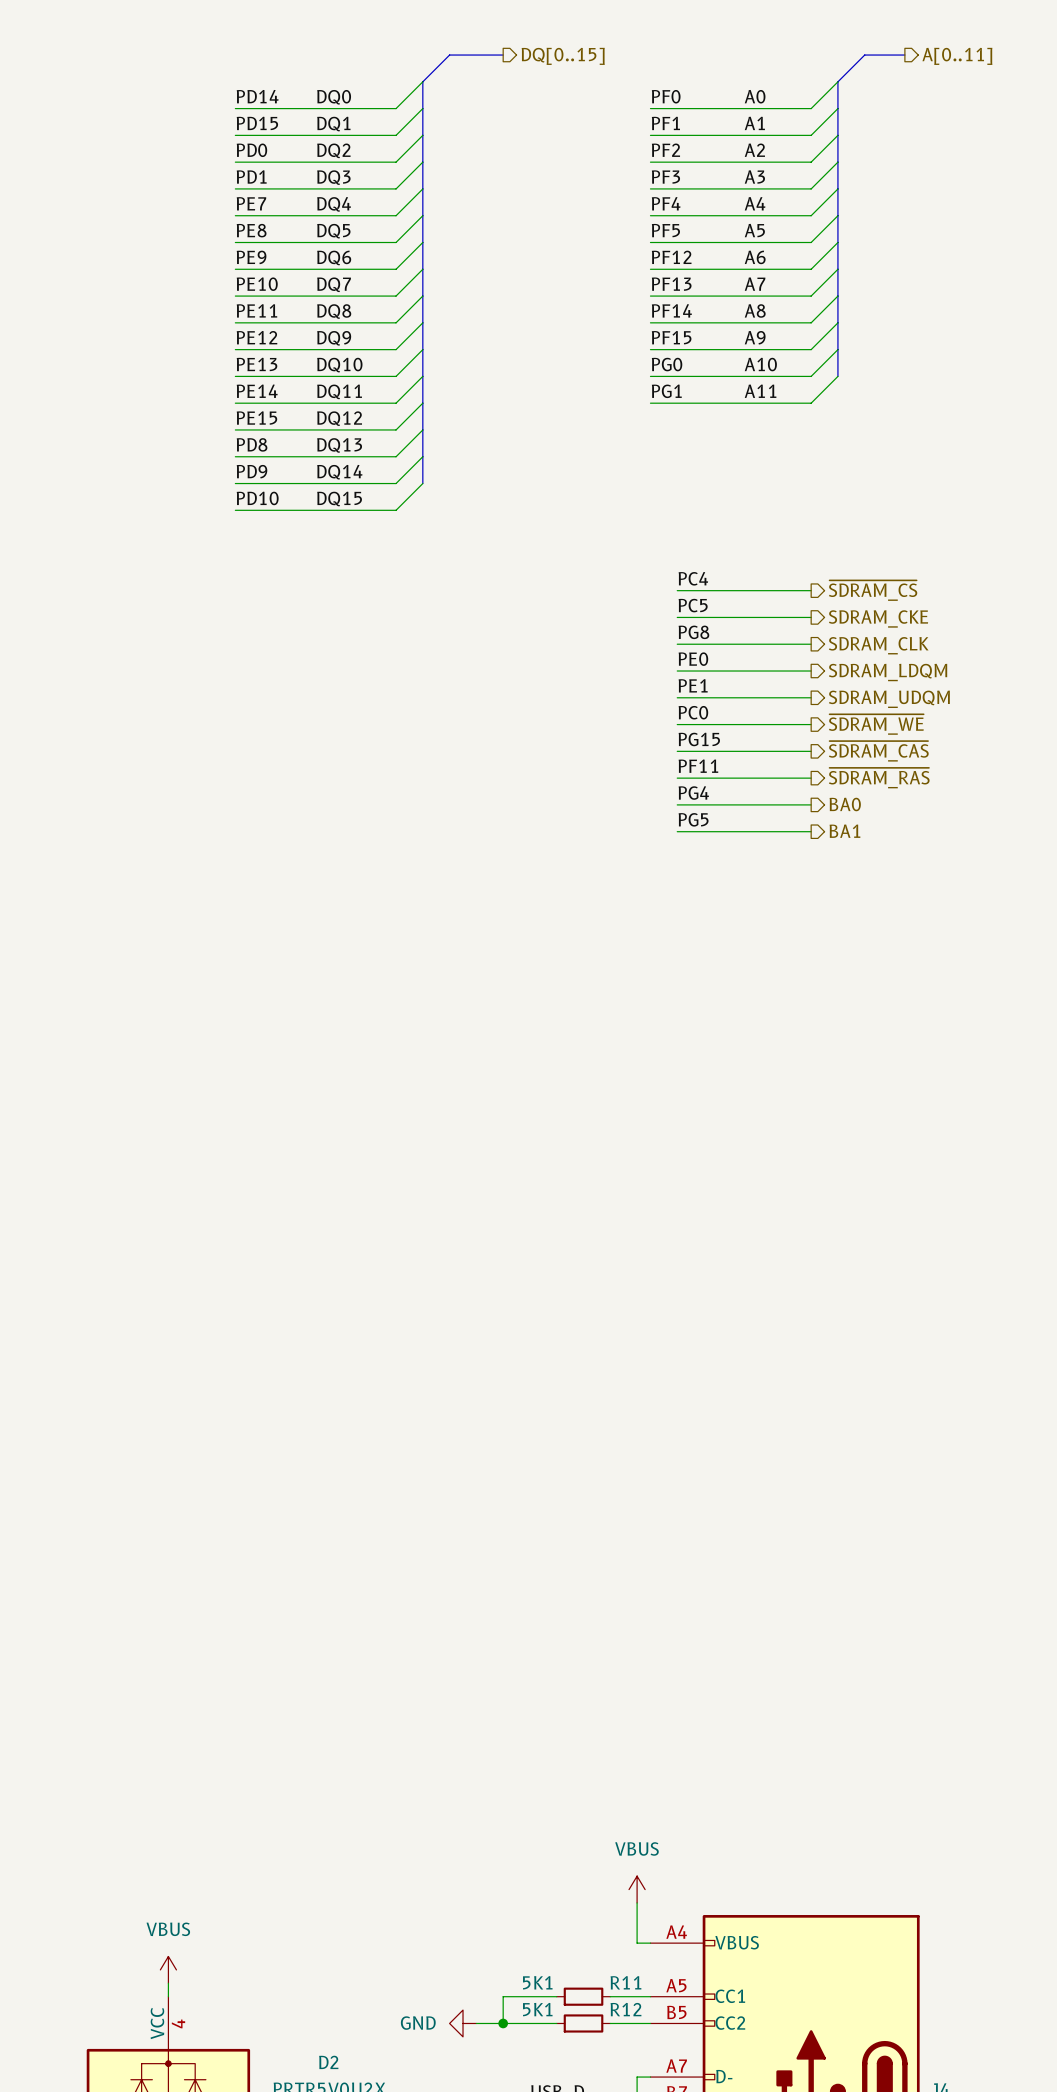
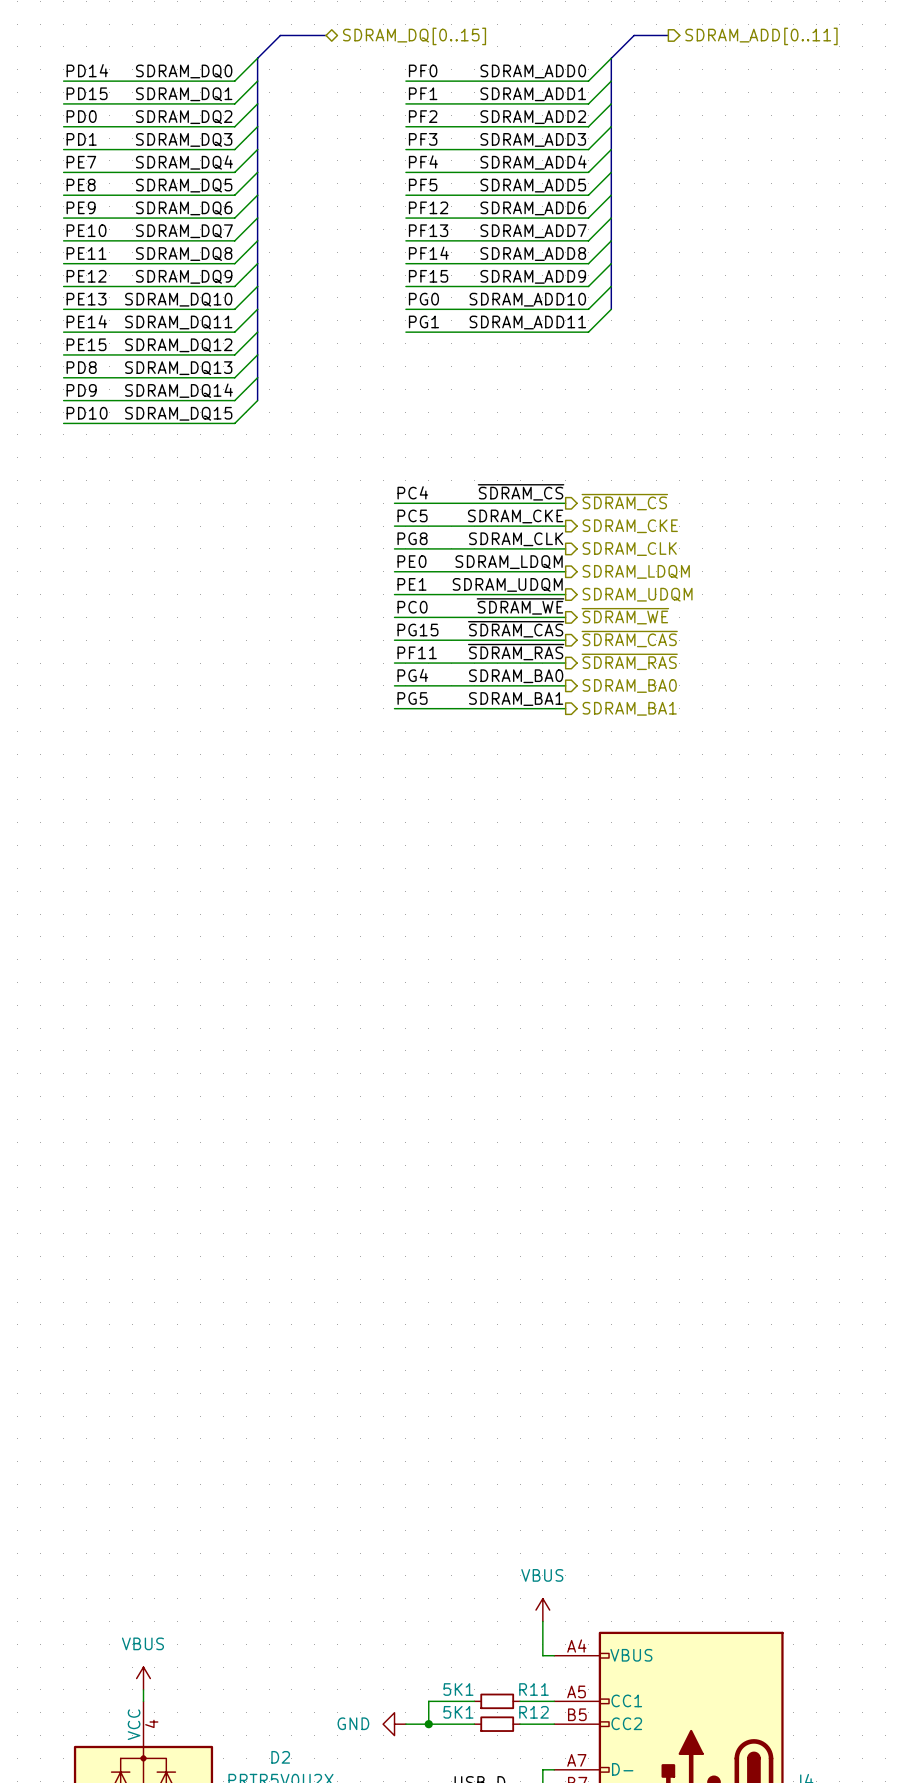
bus: (503, 55) (449, 55) (422, 81) (422, 483) -> (326, 35) (280, 35) (257, 58) (257, 400)
bus: (904, 55) (864, 55) (837, 81) (837, 376) -> (668, 35) (634, 35) (611, 58) (611, 309)
hierarchical label shape: output (563, 56) -> bidirectional (414, 36)
hierarchical label: DQ[0..15] (563, 56) -> SDRAM_DQ[0..15] (414, 36)
hierarchical label: A[0..11] (957, 56) -> SDRAM_ADD[0..11] (761, 36)
wire: none -> (257, 58) (234, 81) (63, 81)
wire: none -> (611, 58) (588, 81) (405, 81)
wire: (422, 81) (396, 108) (235, 108) -> none
wire: (837, 81) (811, 108) (650, 108) -> none
label: none -> SDRAM_DQ0 (184, 71)
label: none -> SDRAM_ADD0 (533, 71)
wire: none -> (257, 81) (234, 103) (63, 103)
wire: none -> (611, 81) (588, 103) (405, 103)
label position: PD14 (257, 96) -> PD14 (87, 70)
label position: PF0 (666, 96) -> PF0 (423, 70)
label: A0 (755, 96) -> none
label: DQ0 (334, 97) -> none
wire: (422, 108) (396, 135) (235, 135) -> none
wire: (837, 108) (811, 135) (650, 135) -> none
label: none -> SDRAM_DQ1 (184, 94)
label: none -> SDRAM_ADD1 (533, 94)
wire: none -> (257, 103) (234, 126) (63, 126)
wire: none -> (611, 103) (588, 126) (405, 126)
label position: PD15 (257, 123) -> PD15 (87, 93)
label position: PF1 (665, 123) -> PF1 (423, 93)
label: A1 (754, 123) -> none
label: DQ1 (333, 124) -> none
wire: (422, 135) (396, 162) (235, 162) -> none
wire: (837, 135) (811, 162) (650, 162) -> none
label: none -> SDRAM_DQ2 (184, 117)
label: none -> SDRAM_ADD2 (533, 117)
wire: none -> (257, 126) (234, 149) (63, 149)
wire: none -> (611, 126) (588, 149) (405, 149)
label position: PD0 (251, 150) -> PD0 (81, 116)
label: DQ2 (333, 150) -> none
label position: PF2 (665, 150) -> PF2 (423, 116)
label: A2 (754, 150) -> none
wire: (422, 162) (396, 188) (235, 188) -> none
wire: (837, 162) (811, 188) (650, 188) -> none
label: none -> SDRAM_DQ3 (184, 139)
label: none -> SDRAM_ADD3 (533, 139)
wire: none -> (257, 149) (234, 172) (63, 172)
wire: none -> (611, 149) (588, 172) (405, 172)
label position: PD1 (251, 176) -> PD1 (81, 139)
label: A3 (754, 176) -> none
label: DQ3 (333, 177) -> none
label position: PF3 (665, 177) -> PF3 (423, 139)
wire: (422, 188) (396, 215) (235, 215) -> none
wire: (837, 188) (811, 215) (650, 215) -> none
label: none -> SDRAM_DQ4 (184, 162)
label: none -> SDRAM_ADD4 (533, 162)
wire: none -> (257, 172) (234, 195) (63, 195)
wire: none -> (611, 172) (588, 195) (405, 195)
label position: PE7 (251, 203) -> PE7 (81, 162)
label position: PF4 (666, 203) -> PF4 (423, 161)
label: A4 (755, 203) -> none
label: DQ4 (334, 204) -> none
wire: (422, 215) (396, 242) (235, 242) -> none
wire: (837, 215) (811, 242) (650, 242) -> none
label: none -> SDRAM_DQ5 (184, 185)
label: none -> SDRAM_ADD5 (533, 185)
wire: none -> (257, 195) (234, 218) (63, 218)
wire: none -> (611, 195) (588, 218) (405, 218)
label position: PE8 (251, 230) -> PE8 (81, 185)
label position: PF5 (665, 230) -> PF5 (423, 185)
label: A5 (754, 230) -> none
label: DQ5 (333, 231) -> none
wire: (422, 242) (396, 269) (235, 269) -> none
wire: (837, 242) (811, 269) (650, 269) -> none
label: none -> SDRAM_DQ6 (184, 208)
label: none -> SDRAM_ADD6 (533, 208)
wire: none -> (257, 218) (234, 240) (63, 240)
wire: none -> (611, 218) (588, 240) (405, 240)
label position: PE9 (251, 257) -> PE9 (81, 207)
label: DQ6 (334, 257) -> none
label position: PF12 (671, 257) -> PF12 (428, 207)
label: A6 (755, 257) -> none
wire: (422, 269) (396, 296) (235, 296) -> none
wire: (837, 269) (811, 296) (650, 296) -> none
label: none -> SDRAM_DQ7 (184, 231)
label: none -> SDRAM_ADD7 (533, 231)
wire: none -> (257, 240) (234, 263) (63, 263)
wire: none -> (611, 240) (588, 263) (405, 263)
label position: PE10 (257, 284) -> PE10 (86, 230)
label: DQ7 (334, 284) -> none
label position: PF13 (671, 284) -> PF13 (428, 230)
label: A7 (755, 284) -> none
wire: (422, 296) (396, 322) (235, 322) -> none
wire: (837, 296) (811, 322) (650, 322) -> none
label: none -> SDRAM_DQ8 (184, 254)
label: none -> SDRAM_ADD8 (533, 254)
wire: none -> (257, 263) (234, 286) (63, 286)
wire: none -> (611, 263) (588, 286) (405, 286)
label position: PE11 (256, 310) -> PE11 (86, 253)
label position: PF14 (671, 310) -> PF14 (428, 253)
label: A8 (755, 310) -> none
label: DQ8 (334, 311) -> none
wire: (422, 322) (396, 349) (235, 349) -> none
wire: (837, 322) (811, 349) (650, 349) -> none
label: none -> SDRAM_DQ9 (184, 276)
label: none -> SDRAM_ADD9 (533, 276)
wire: none -> (257, 286) (234, 309) (63, 309)
wire: none -> (611, 286) (588, 309) (405, 309)
label position: PE12 (256, 337) -> PE12 (86, 276)
label position: PF15 (671, 337) -> PF15 (428, 276)
label: A9 (755, 337) -> none
label: DQ9 (334, 338) -> none
wire: (422, 349) (396, 376) (235, 376) -> none
wire: (837, 349) (811, 376) (650, 376) -> none
label: none -> SDRAM_DQ10 (178, 299)
label: none -> SDRAM_ADD10 (527, 299)
wire: none -> (257, 309) (234, 332) (63, 332)
wire: none -> (611, 309) (588, 332) (405, 332)
label position: PE13 (257, 364) -> PE13 (86, 299)
label position: PG0 (667, 364) -> PG0 (423, 299)
label: A10 (760, 364) -> none
label: DQ10 (339, 365) -> none
wire: (422, 376) (396, 403) (235, 403) -> none
wire: (837, 376) (811, 403) (650, 403) -> none
label: none -> SDRAM_DQ11 (178, 322)
label: none -> SDRAM_ADD11 (527, 322)
wire: none -> (257, 332) (234, 354) (63, 354)
label position: PE14 (257, 391) -> PE14 (86, 321)
label: DQ11 (339, 391) -> none
label position: PG1 (666, 391) -> PG1 (423, 321)
label: A11 (760, 391) -> none
wire: (422, 403) (396, 429) (235, 429) -> none
label: none -> SDRAM_DQ12 (178, 345)
wire: none -> (257, 354) (234, 377) (63, 377)
label position: PE15 (256, 418) -> PE15 (86, 344)
label: DQ12 (339, 418) -> none
wire: (422, 429) (396, 456) (235, 456) -> none
label: none -> SDRAM_DQ13 (178, 368)
wire: none -> (257, 377) (234, 400) (63, 400)
label position: PD8 (252, 444) -> PD8 (81, 367)
label: DQ13 (339, 445) -> none
wire: (422, 456) (396, 483) (235, 483) -> none
label: none -> SDRAM_DQ14 (179, 390)
wire: none -> (257, 400) (234, 423) (63, 423)
label position: PD9 (252, 471) -> PD9 (81, 390)
label: DQ14 (339, 472) -> none
wire: (422, 483) (396, 510) (235, 510) -> none
label: none -> SDRAM_DQ15 (178, 413)
label position: PD10 (257, 498) -> PD10 (87, 413)
label: DQ15 (339, 499) -> none
label position: PC4 (693, 578) -> PC4 (412, 492)
label: none -> ~{SDRAM_CS} (521, 492)
wire: none -> (394, 503) (565, 503)
wire: (677, 590) (811, 590) -> none
hierarchical label position: ~{SDRAM_CS} (873, 590) -> ~{SDRAM_CS} (624, 502)
label position: PC5 (693, 605) -> PC5 (412, 515)
label: none -> SDRAM_CKE (515, 516)
wire: none -> (394, 526) (565, 526)
wire: (677, 617) (811, 617) -> none
hierarchical label position: SDRAM_CKE (878, 618) -> SDRAM_CKE (630, 526)
label position: PG8 (693, 632) -> PG8 (412, 538)
label: none -> SDRAM_CLK (516, 539)
wire: none -> (394, 548) (565, 548)
wire: (677, 644) (811, 644) -> none
hierarchical label position: SDRAM_CLK (878, 645) -> SDRAM_CLK (629, 549)
label position: PE0 (693, 659) -> PE0 (411, 561)
label: none -> SDRAM_LDQM (509, 562)
wire: none -> (394, 571) (565, 571)
wire: (677, 671) (811, 671) -> none
hierarchical label position: SDRAM_LDQM (888, 672) -> SDRAM_LDQM (636, 571)
label position: PE1 (693, 685) -> PE1 (411, 584)
label: none -> SDRAM_UDQM (507, 584)
wire: none -> (394, 594) (565, 594)
wire: (677, 697) (811, 697) -> none
hierarchical label position: SDRAM_UDQM (889, 699) -> SDRAM_UDQM (637, 594)
label position: PC0 (693, 712) -> PC0 (412, 607)
label: none -> ~{SDRAM_WE} (520, 606)
wire: none -> (394, 617) (565, 617)
wire: (677, 724) (811, 724) -> none
hierarchical label position: ~{SDRAM_WE} (876, 724) -> ~{SDRAM_WE} (625, 616)
label: none -> ~{SDRAM_CAS} (516, 629)
label position: PG15 (699, 739) -> PG15 (417, 630)
wire: none -> (394, 640) (565, 640)
wire: (677, 751) (811, 751) -> none
hierarchical label position: ~{SDRAM_CAS} (878, 751) -> ~{SDRAM_CAS} (629, 639)
label: none -> ~{SDRAM_RAS} (516, 652)
label position: PF11 (698, 766) -> PF11 (417, 652)
wire: none -> (394, 663) (565, 663)
wire: (677, 778) (811, 778) -> none
hierarchical label position: ~{SDRAM_RAS} (879, 778) -> ~{SDRAM_RAS} (629, 661)
label position: PG4 (693, 793) -> PG4 (412, 675)
label: none -> SDRAM_BA0 (516, 676)
wire: none -> (394, 685) (565, 685)
wire: (677, 804) (811, 804) -> none
hierarchical label: BA0 (845, 804) -> none
hierarchical label: none -> SDRAM_BA0 (629, 685)
label position: PG5 (693, 819) -> PG5 (412, 698)
label: none -> SDRAM_BA1 (516, 699)
wire: none -> (394, 708) (565, 708)
wire: (677, 831) (811, 831) -> none
hierarchical label: BA1 (844, 831) -> none
hierarchical label: none -> SDRAM_BA1 (629, 708)

